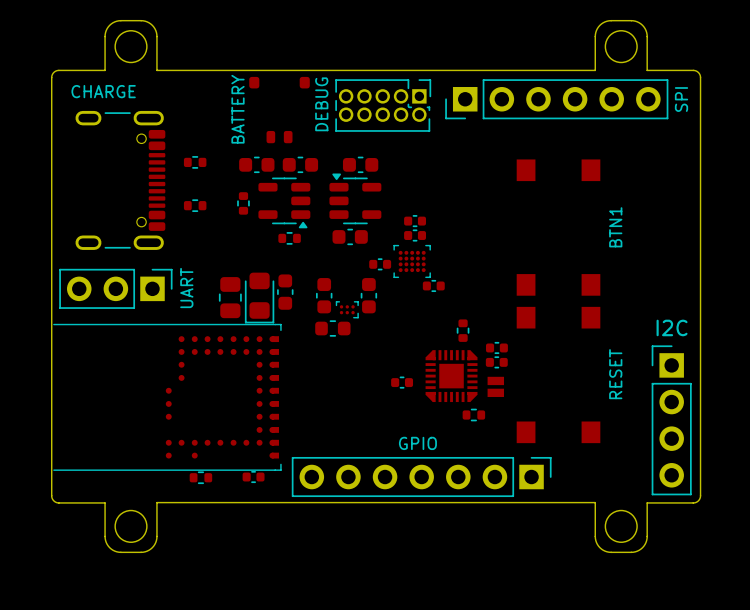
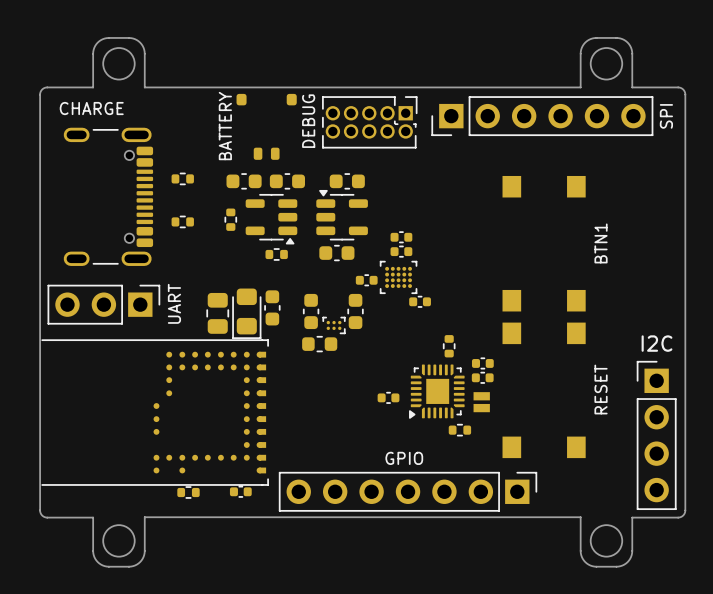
part footprint: [425, 350, 478, 403] -> [409, 364, 465, 419]

